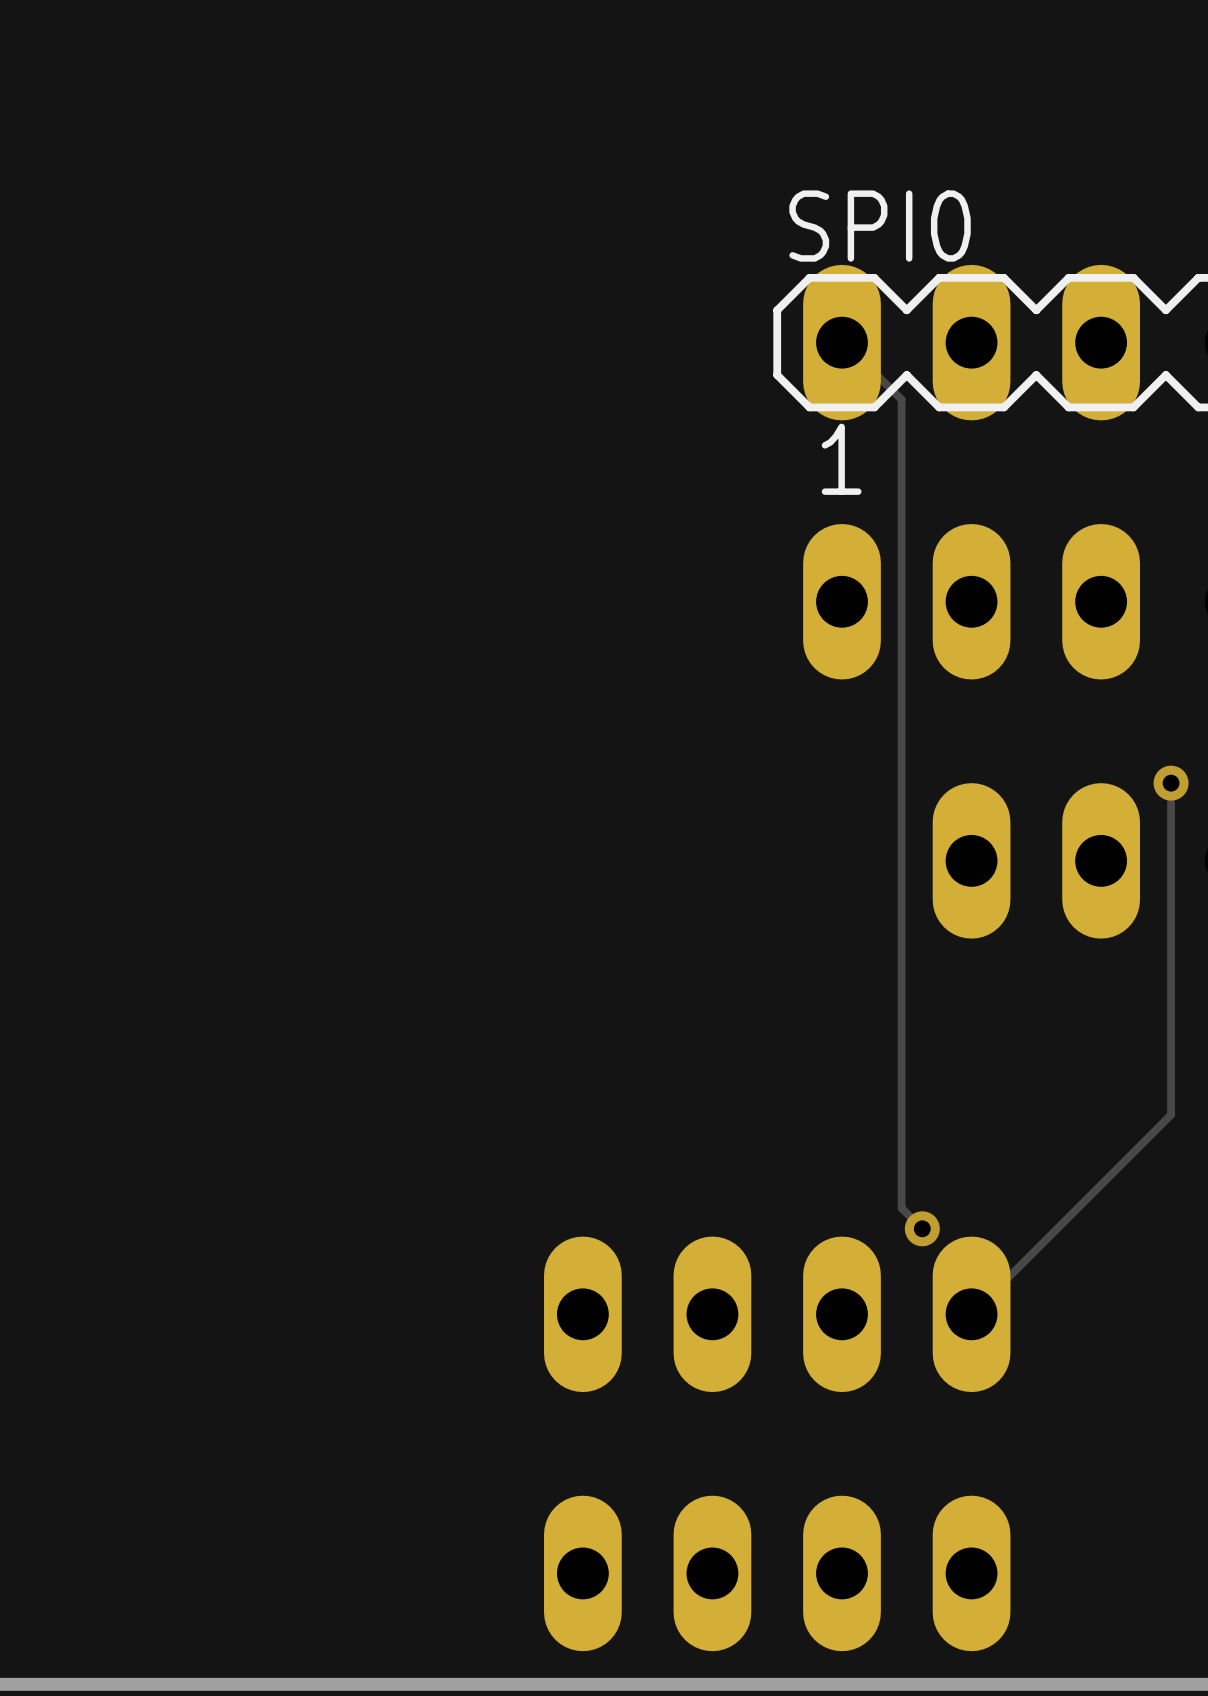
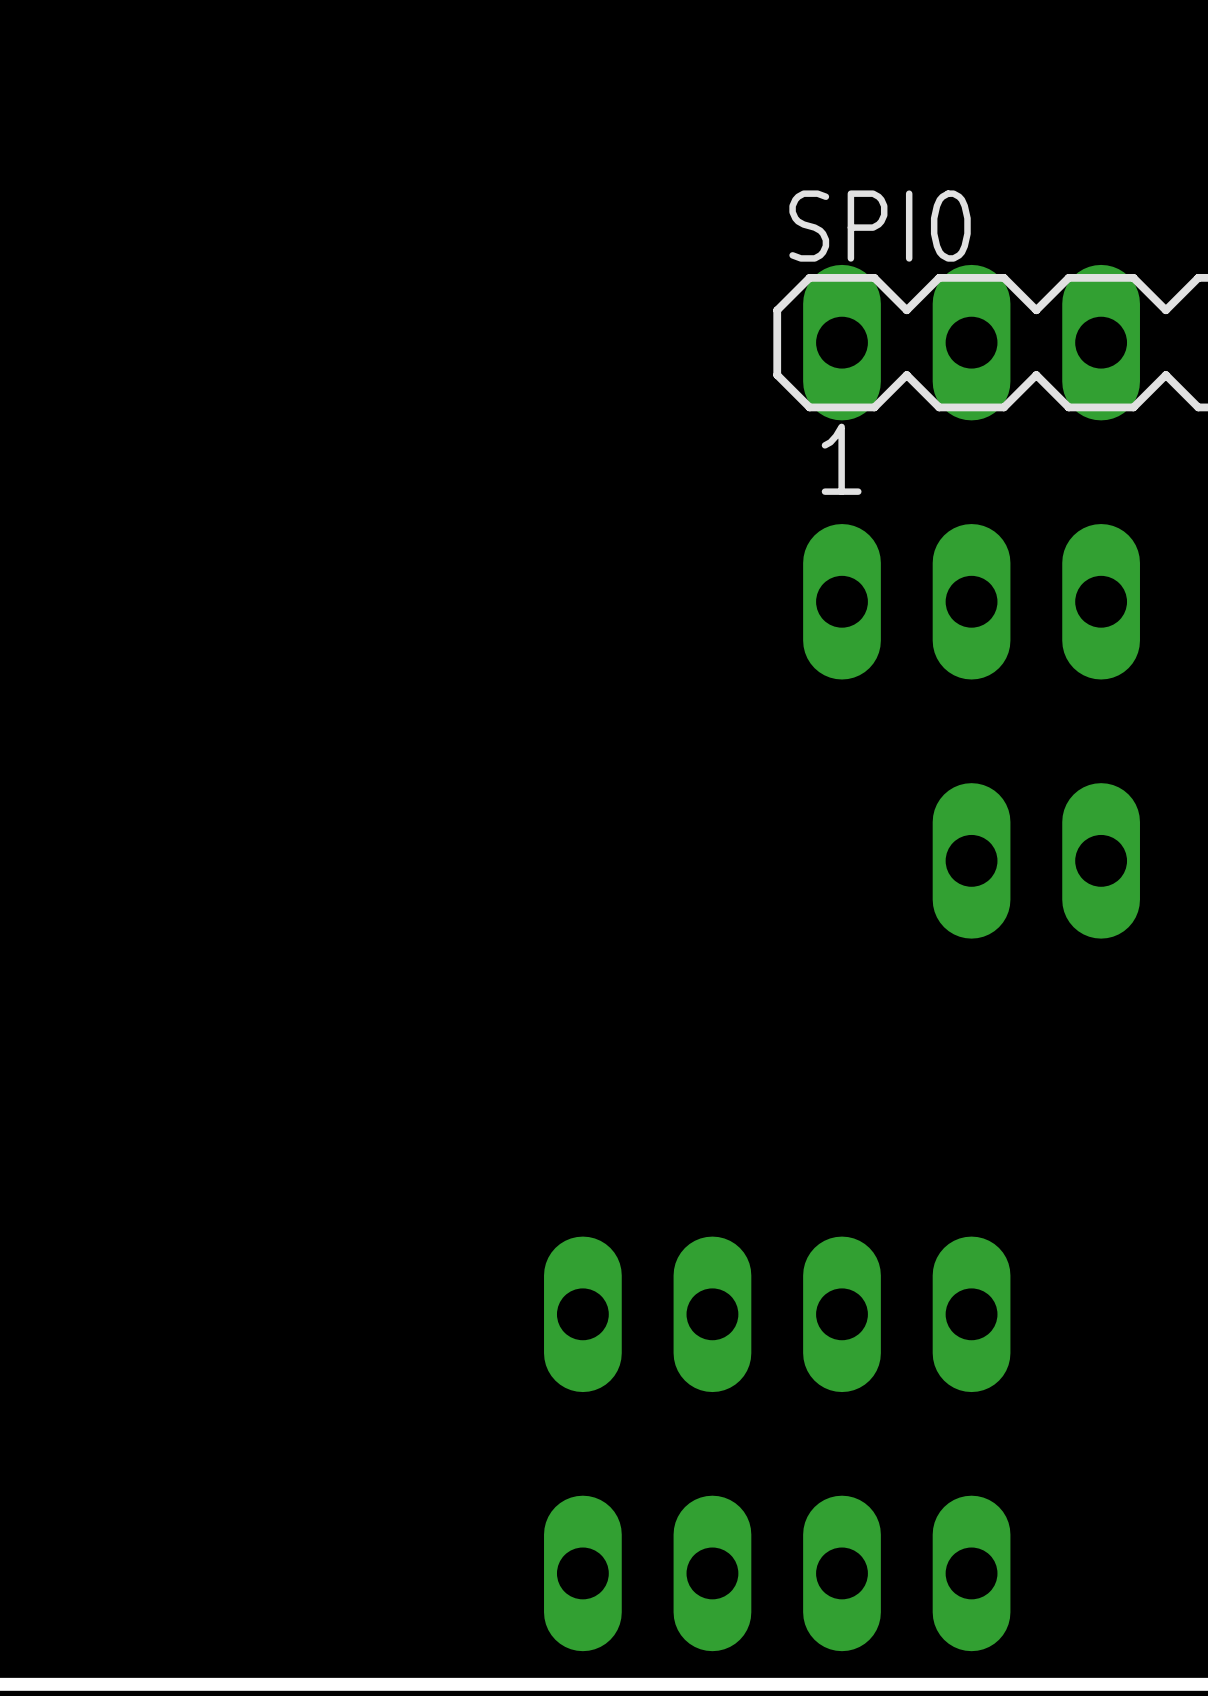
track: (842, 342) (849, 347) (901, 399) (901, 1208) (922, 1228) -> none
track: (1171, 783) (1171, 1114) (971, 1314) -> none
via: (1171, 783) -> none
via: (922, 1228) -> none

